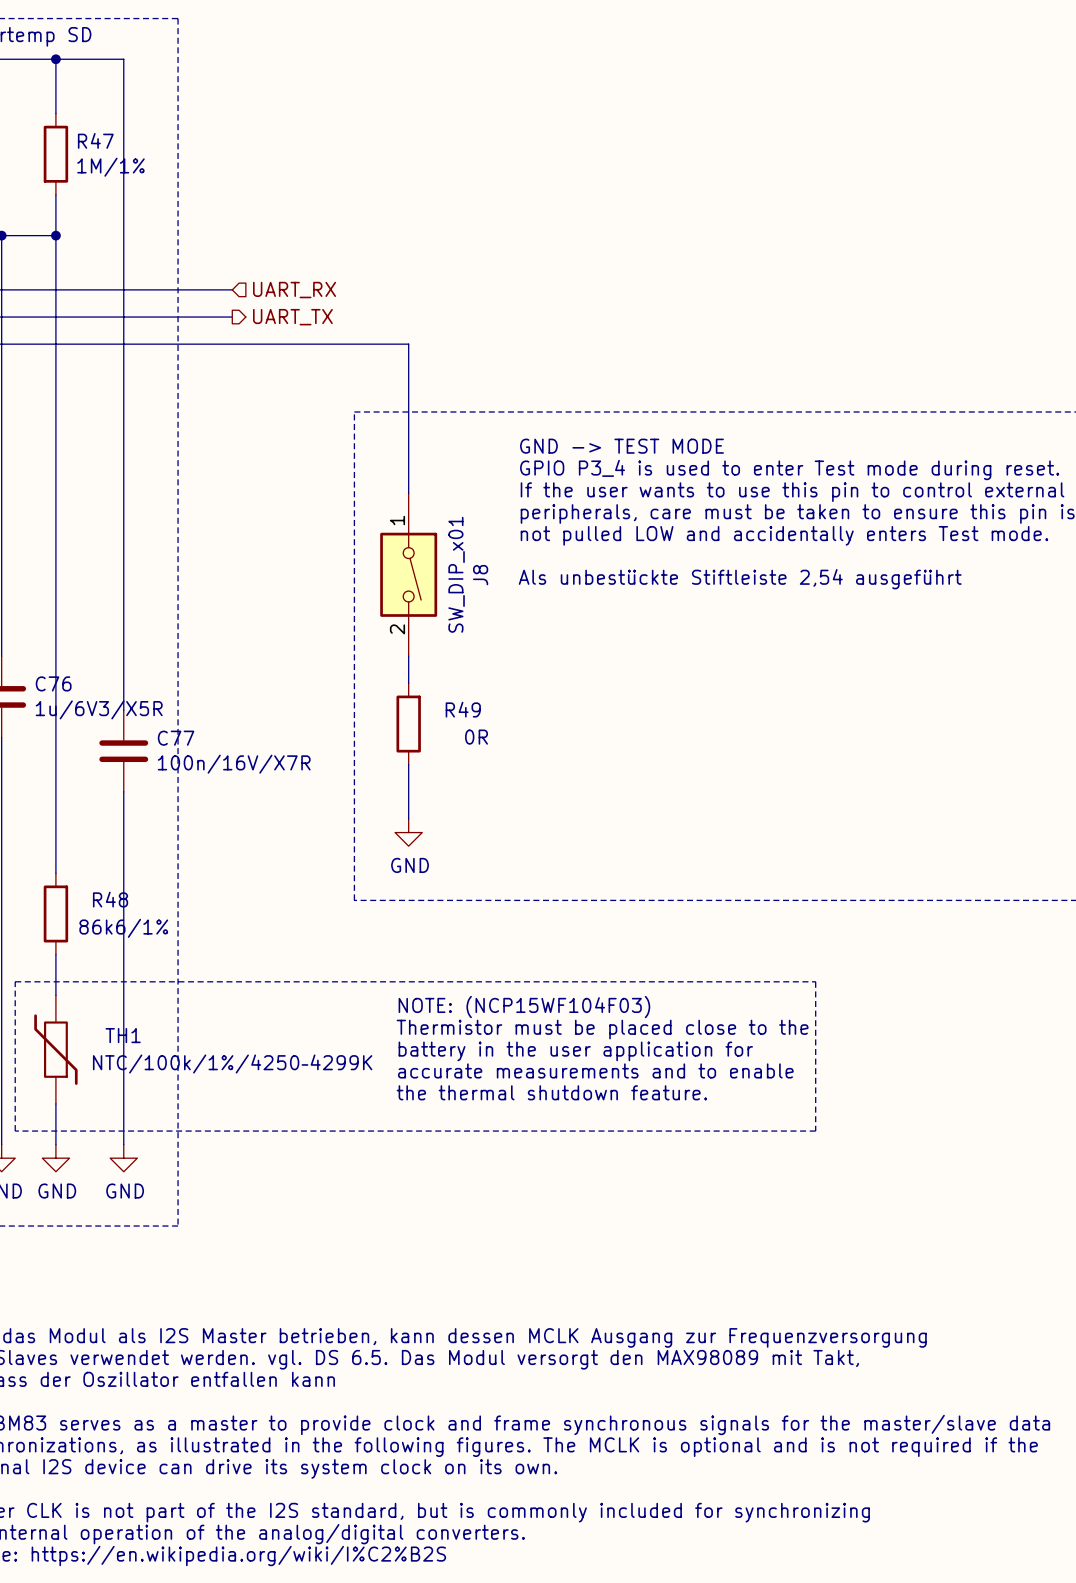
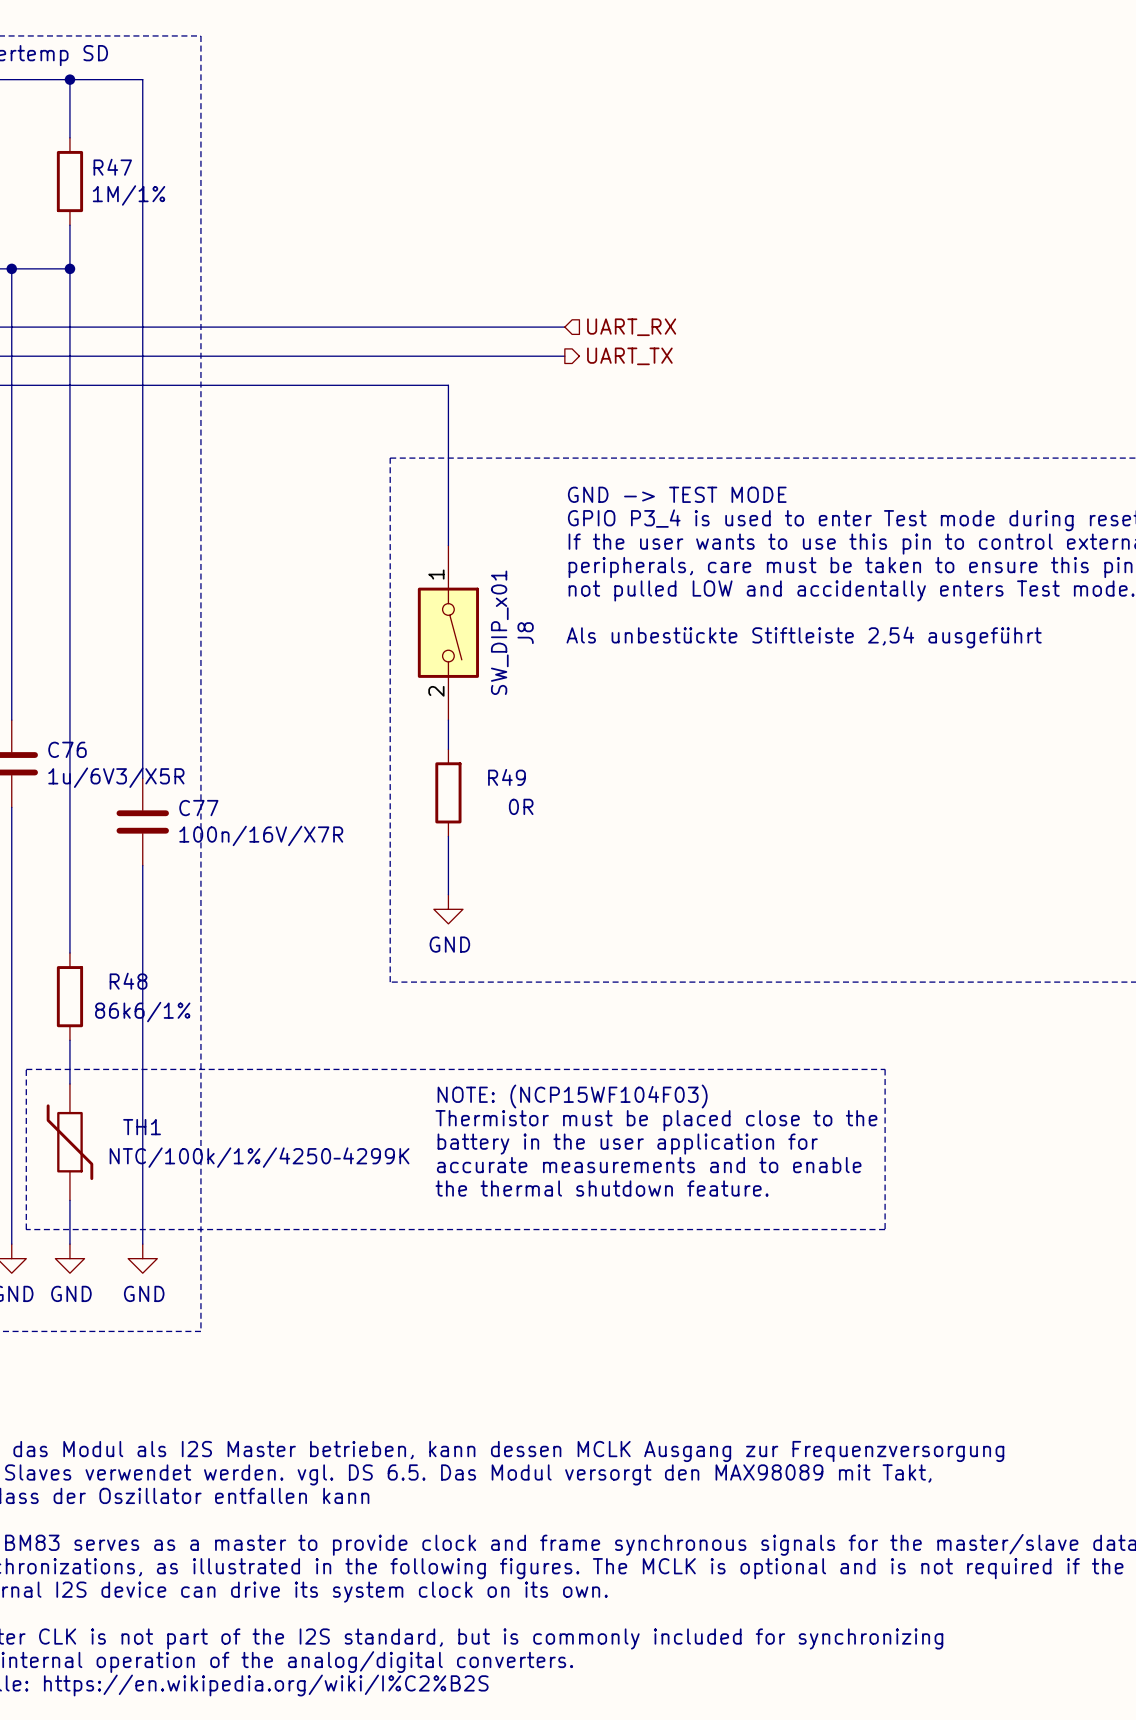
wire: none -> (259, 327) (564, 327)
hierarchical label: UART_RX (294, 290) -> none
hierarchical label: none -> UART_RX (631, 327)
wire: none -> (259, 356) (564, 356)
hierarchical label: UART_TX (292, 317) -> none
hierarchical label: none -> UART_TX (629, 356)

